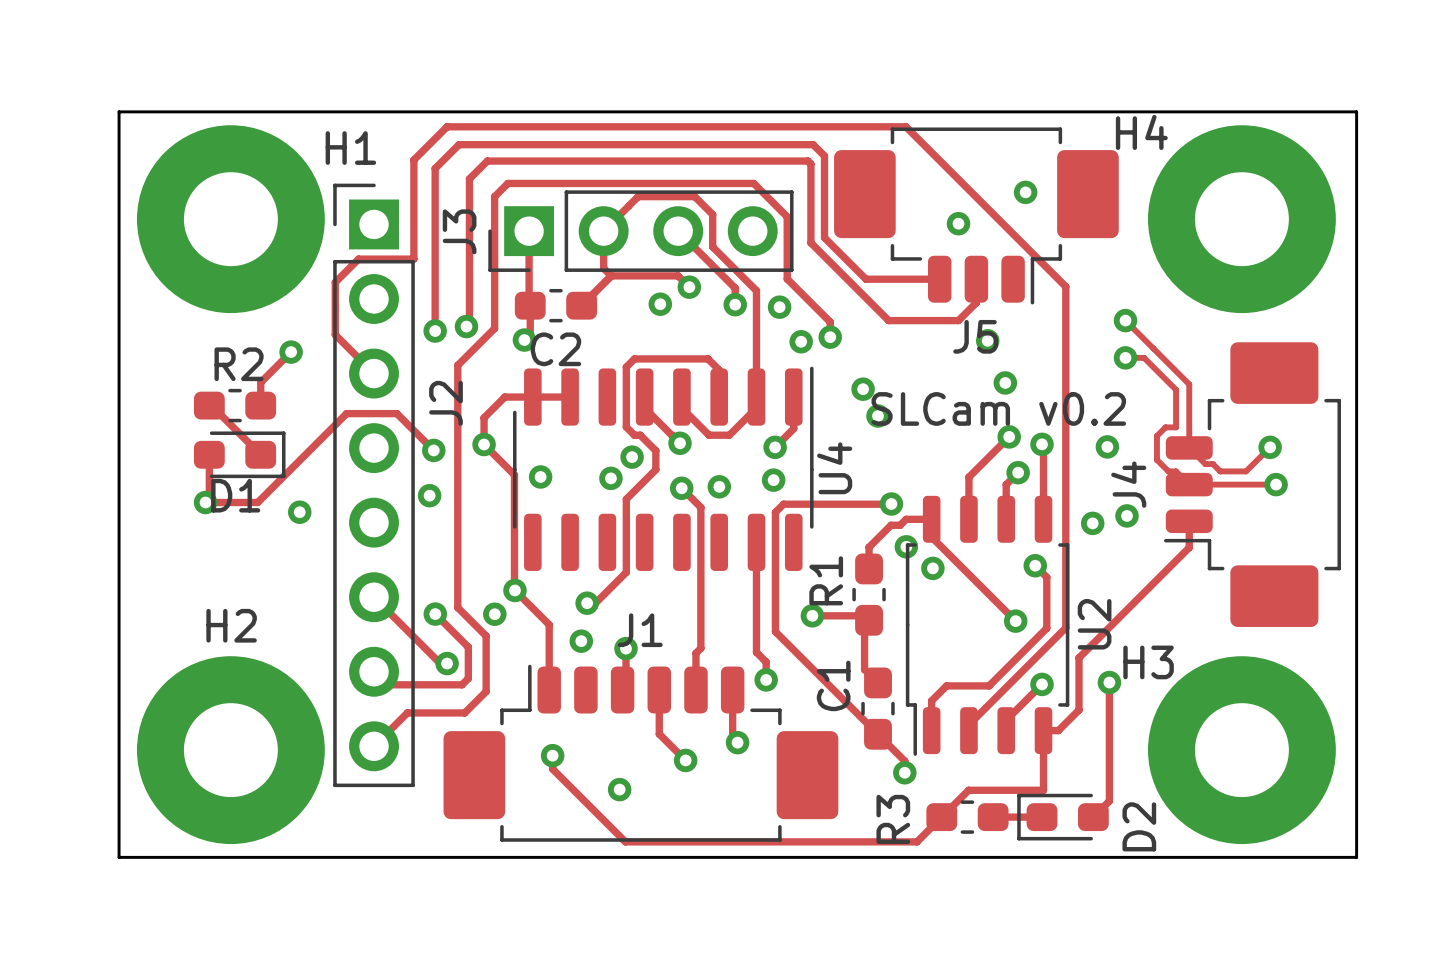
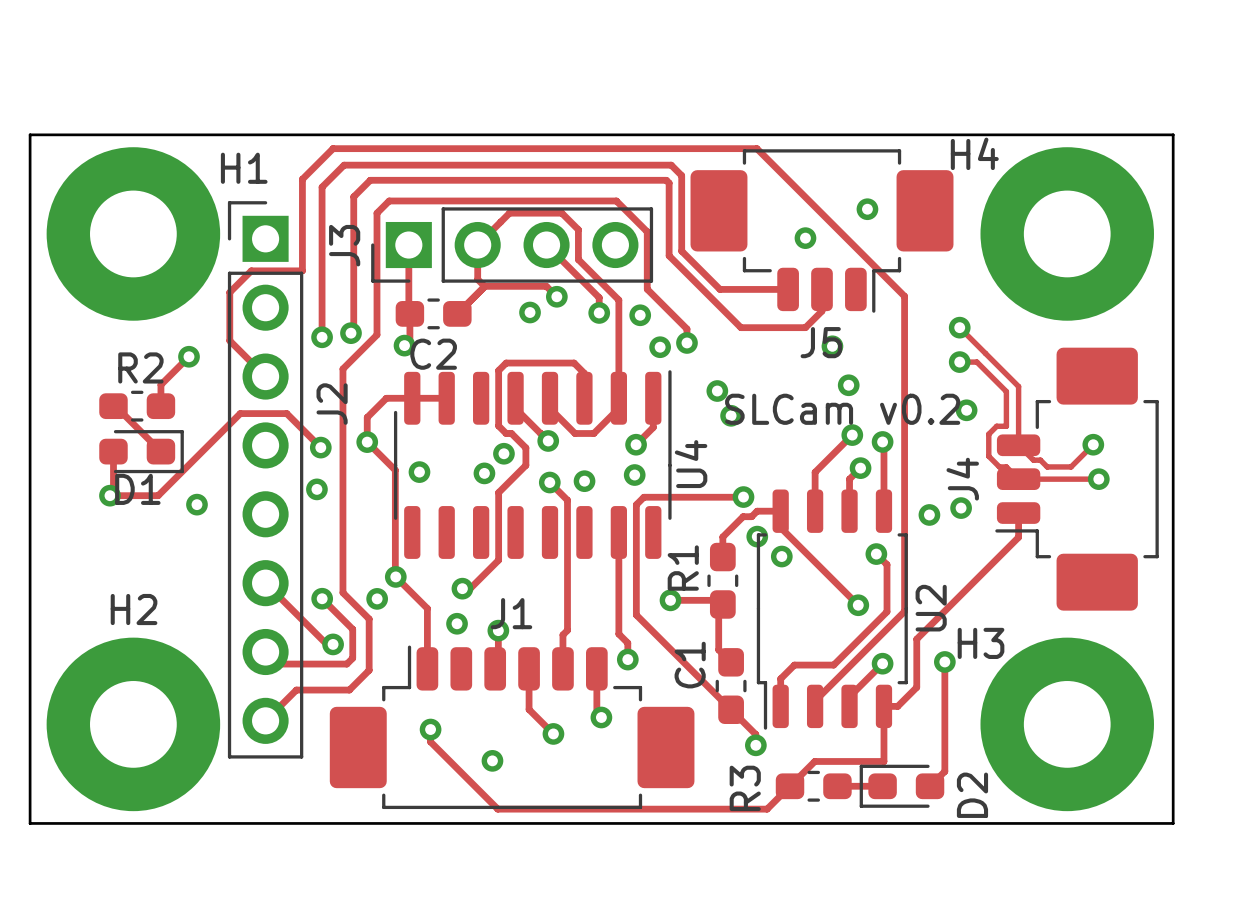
via position: (1107, 446) -> (966, 410)

